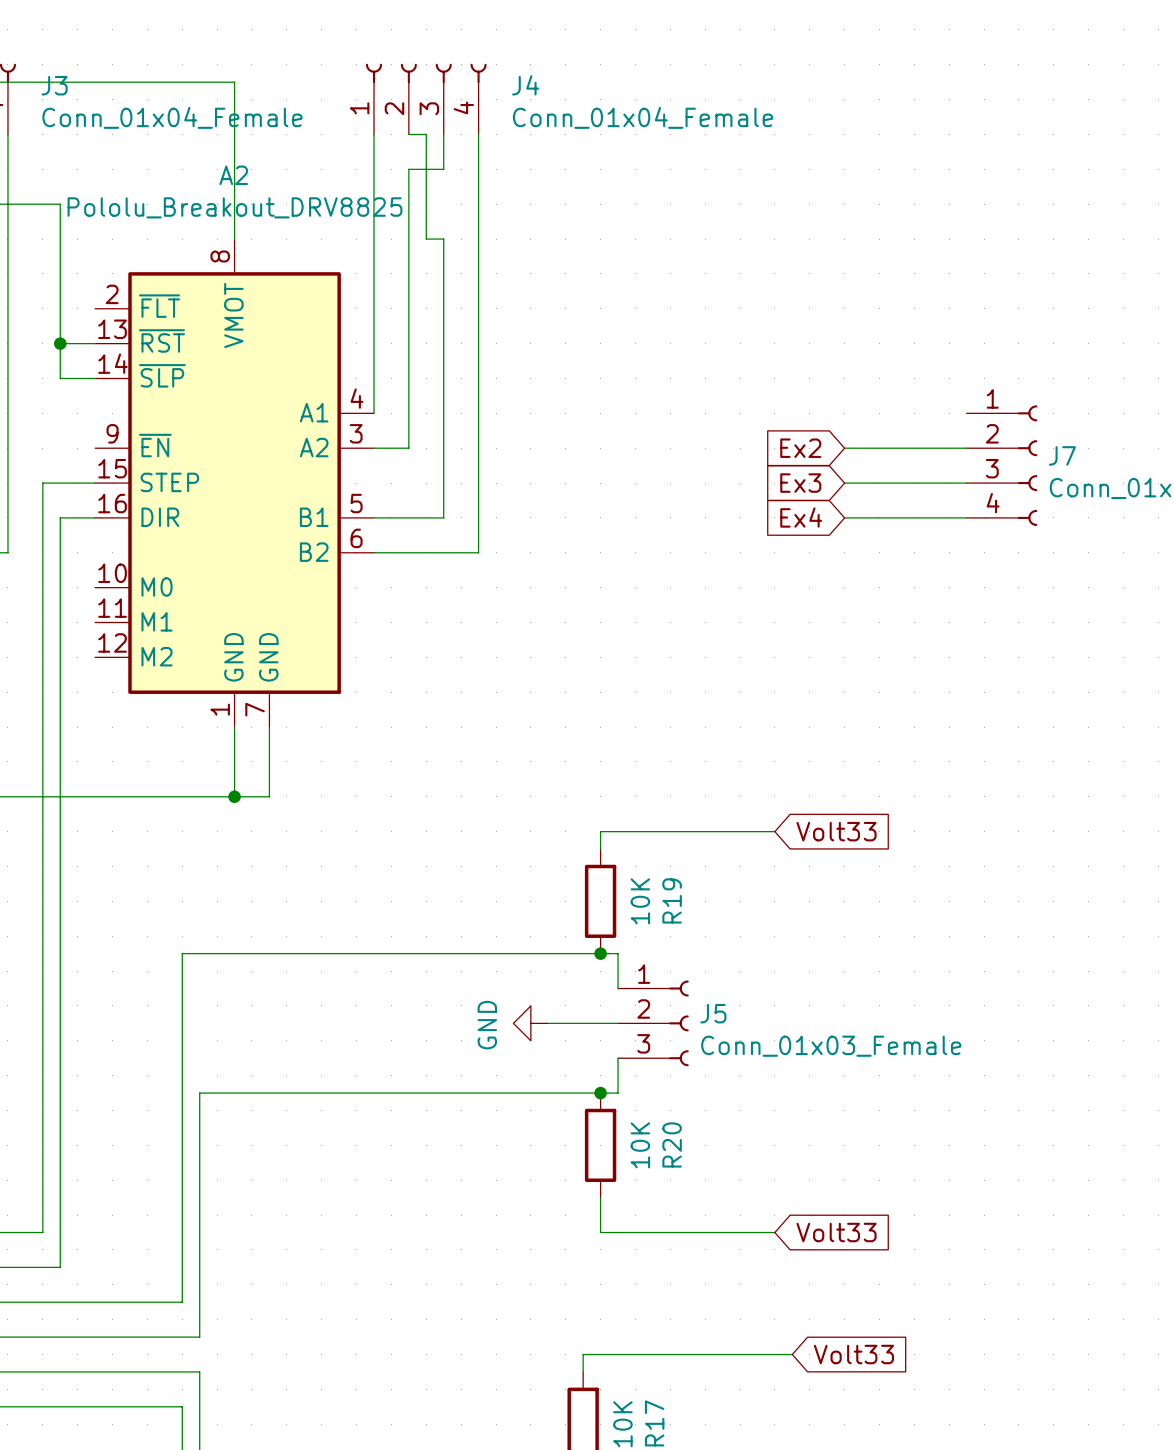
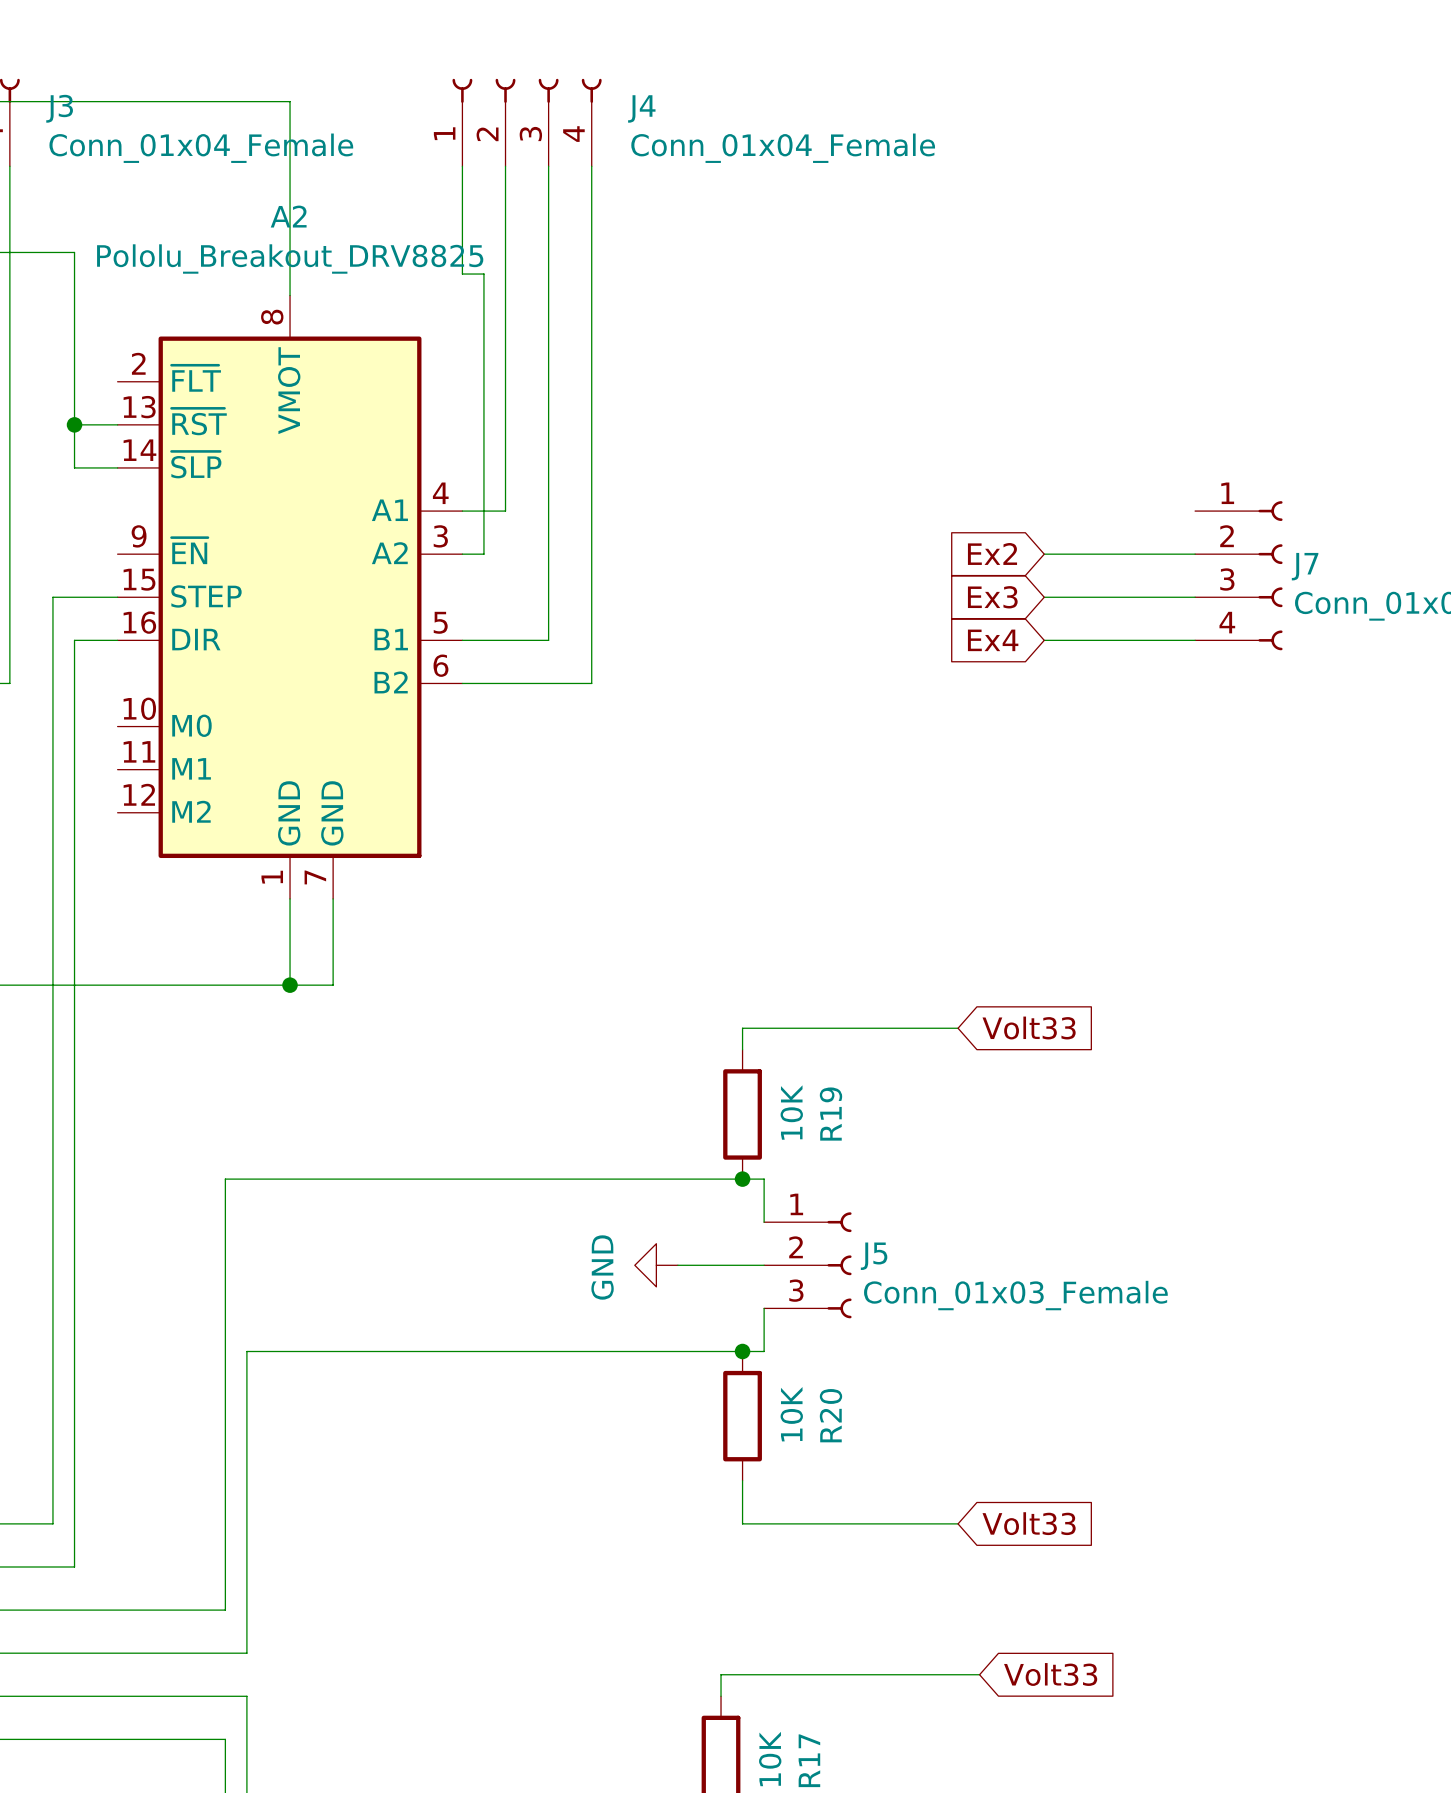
wire: (408, 134) (426, 134) (426, 239) (443, 239) -> (548, 209) (548, 295)
wire: (408, 169) (443, 169) -> (505, 209) (505, 166)
wire: (374, 221) (374, 413) -> (462, 274) (483, 274) (483, 554)
wire: (408, 413) (408, 448) (391, 448) -> (505, 511) (462, 511)

